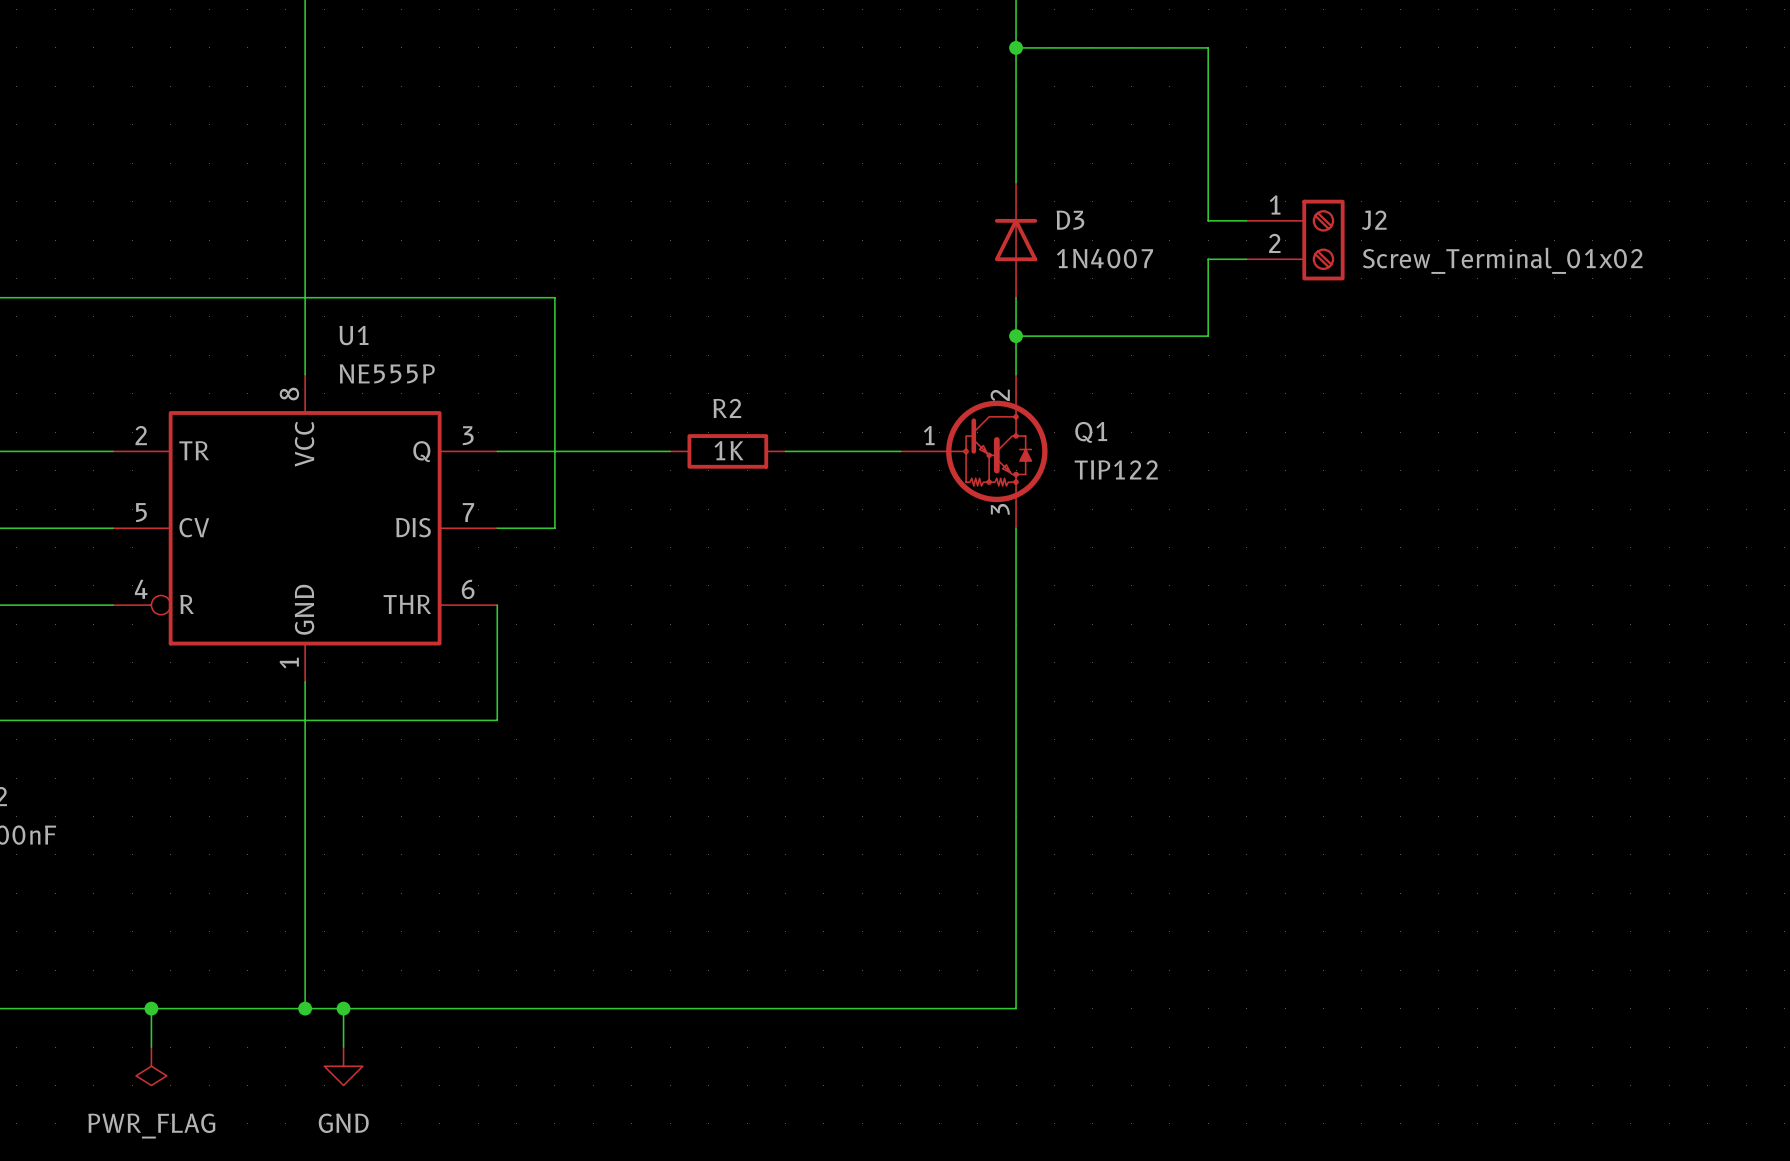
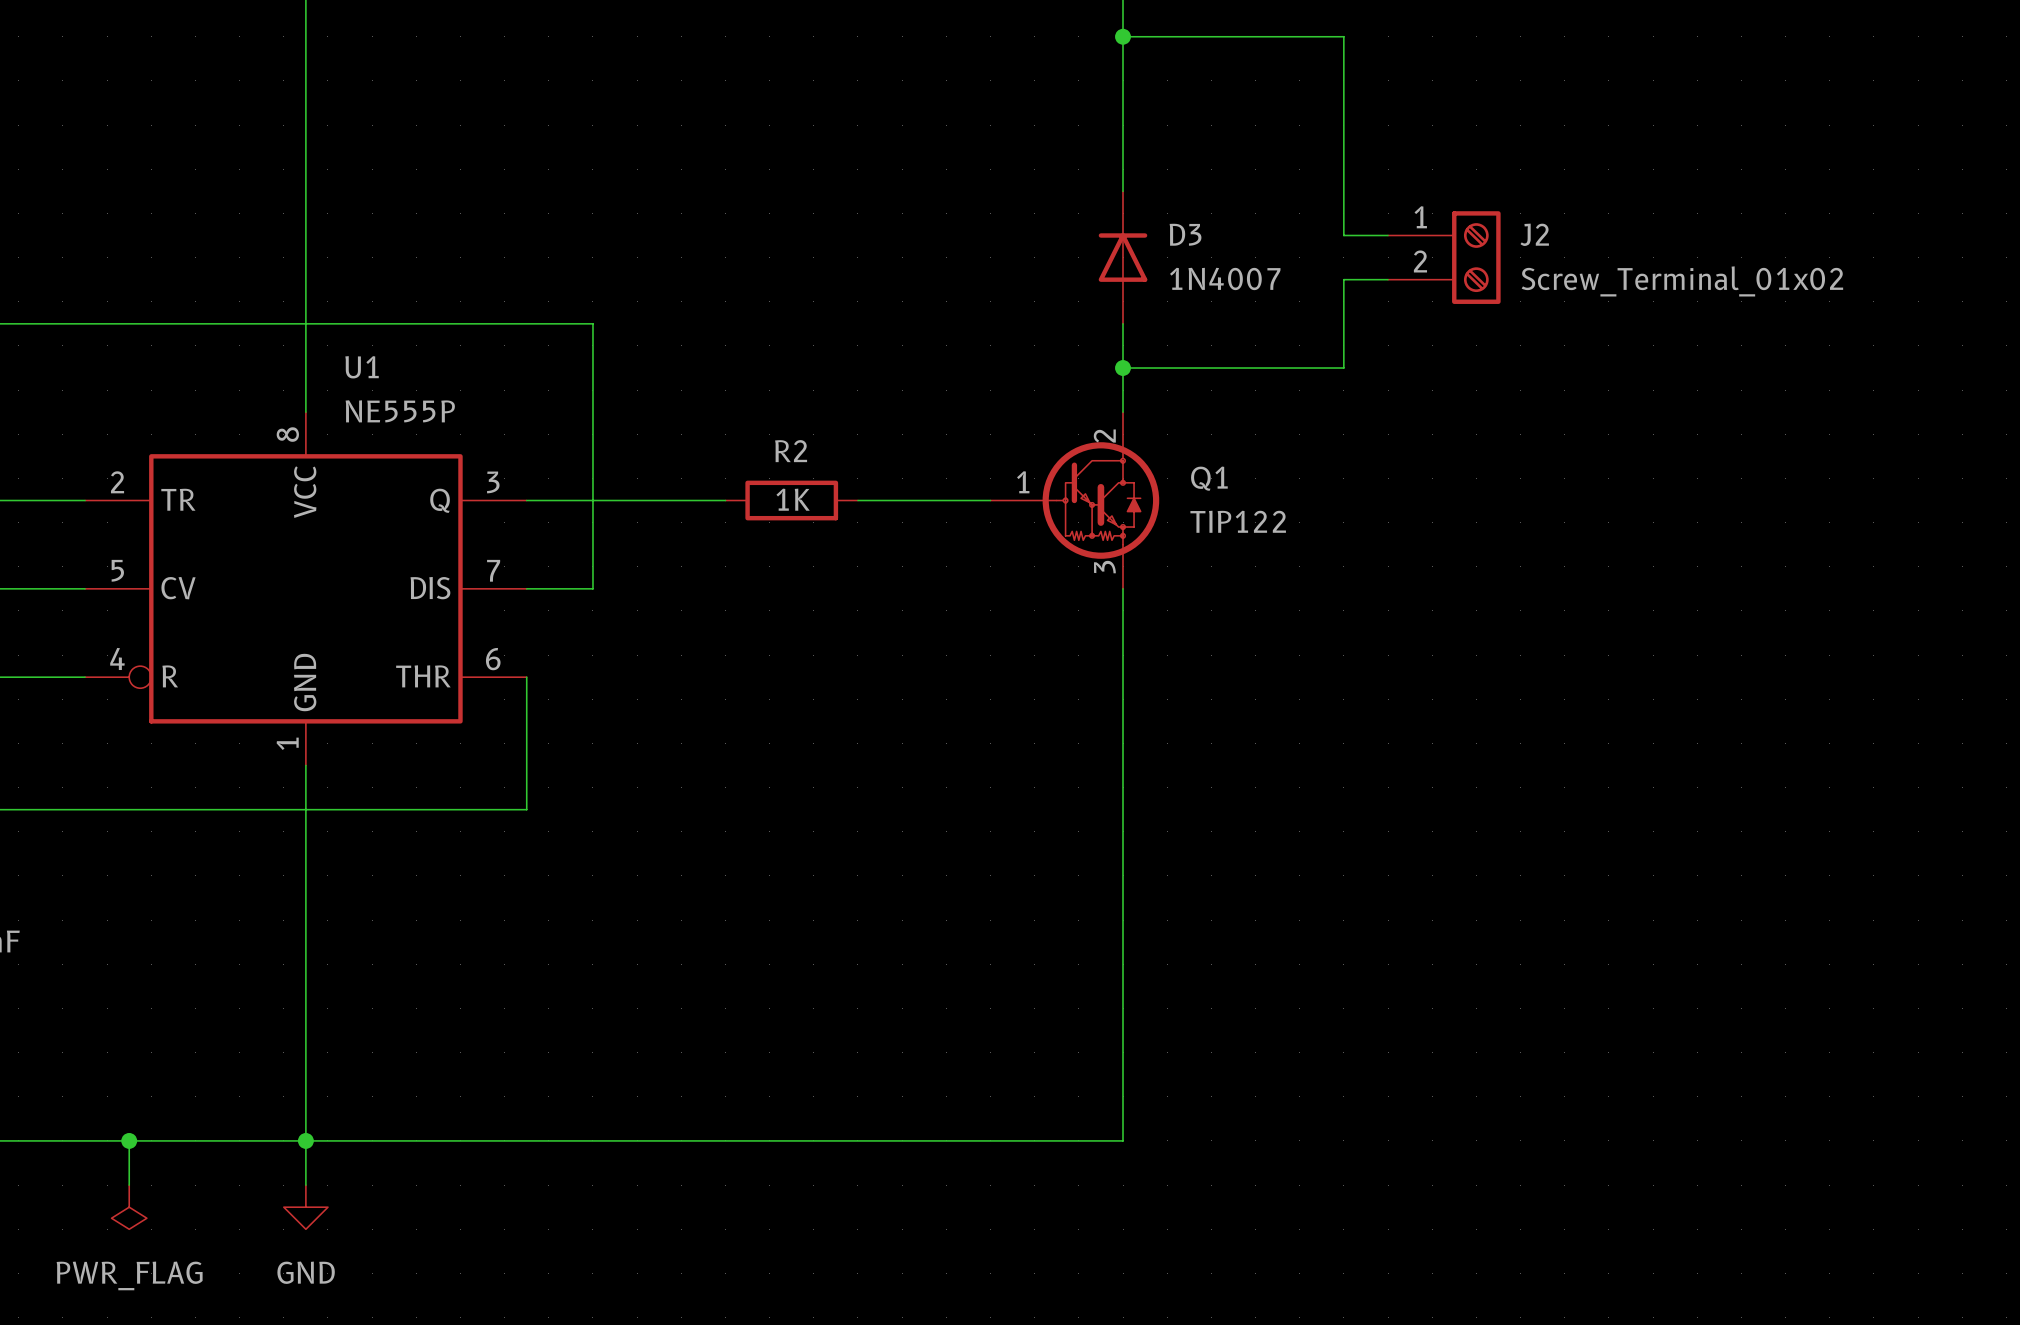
wire: (343, 1008) (343, 1047) -> (305, 1140) (305, 1185)
junction: (343, 1008) -> none
power symbol position: GND (343, 1066) -> GND (305, 1207)

